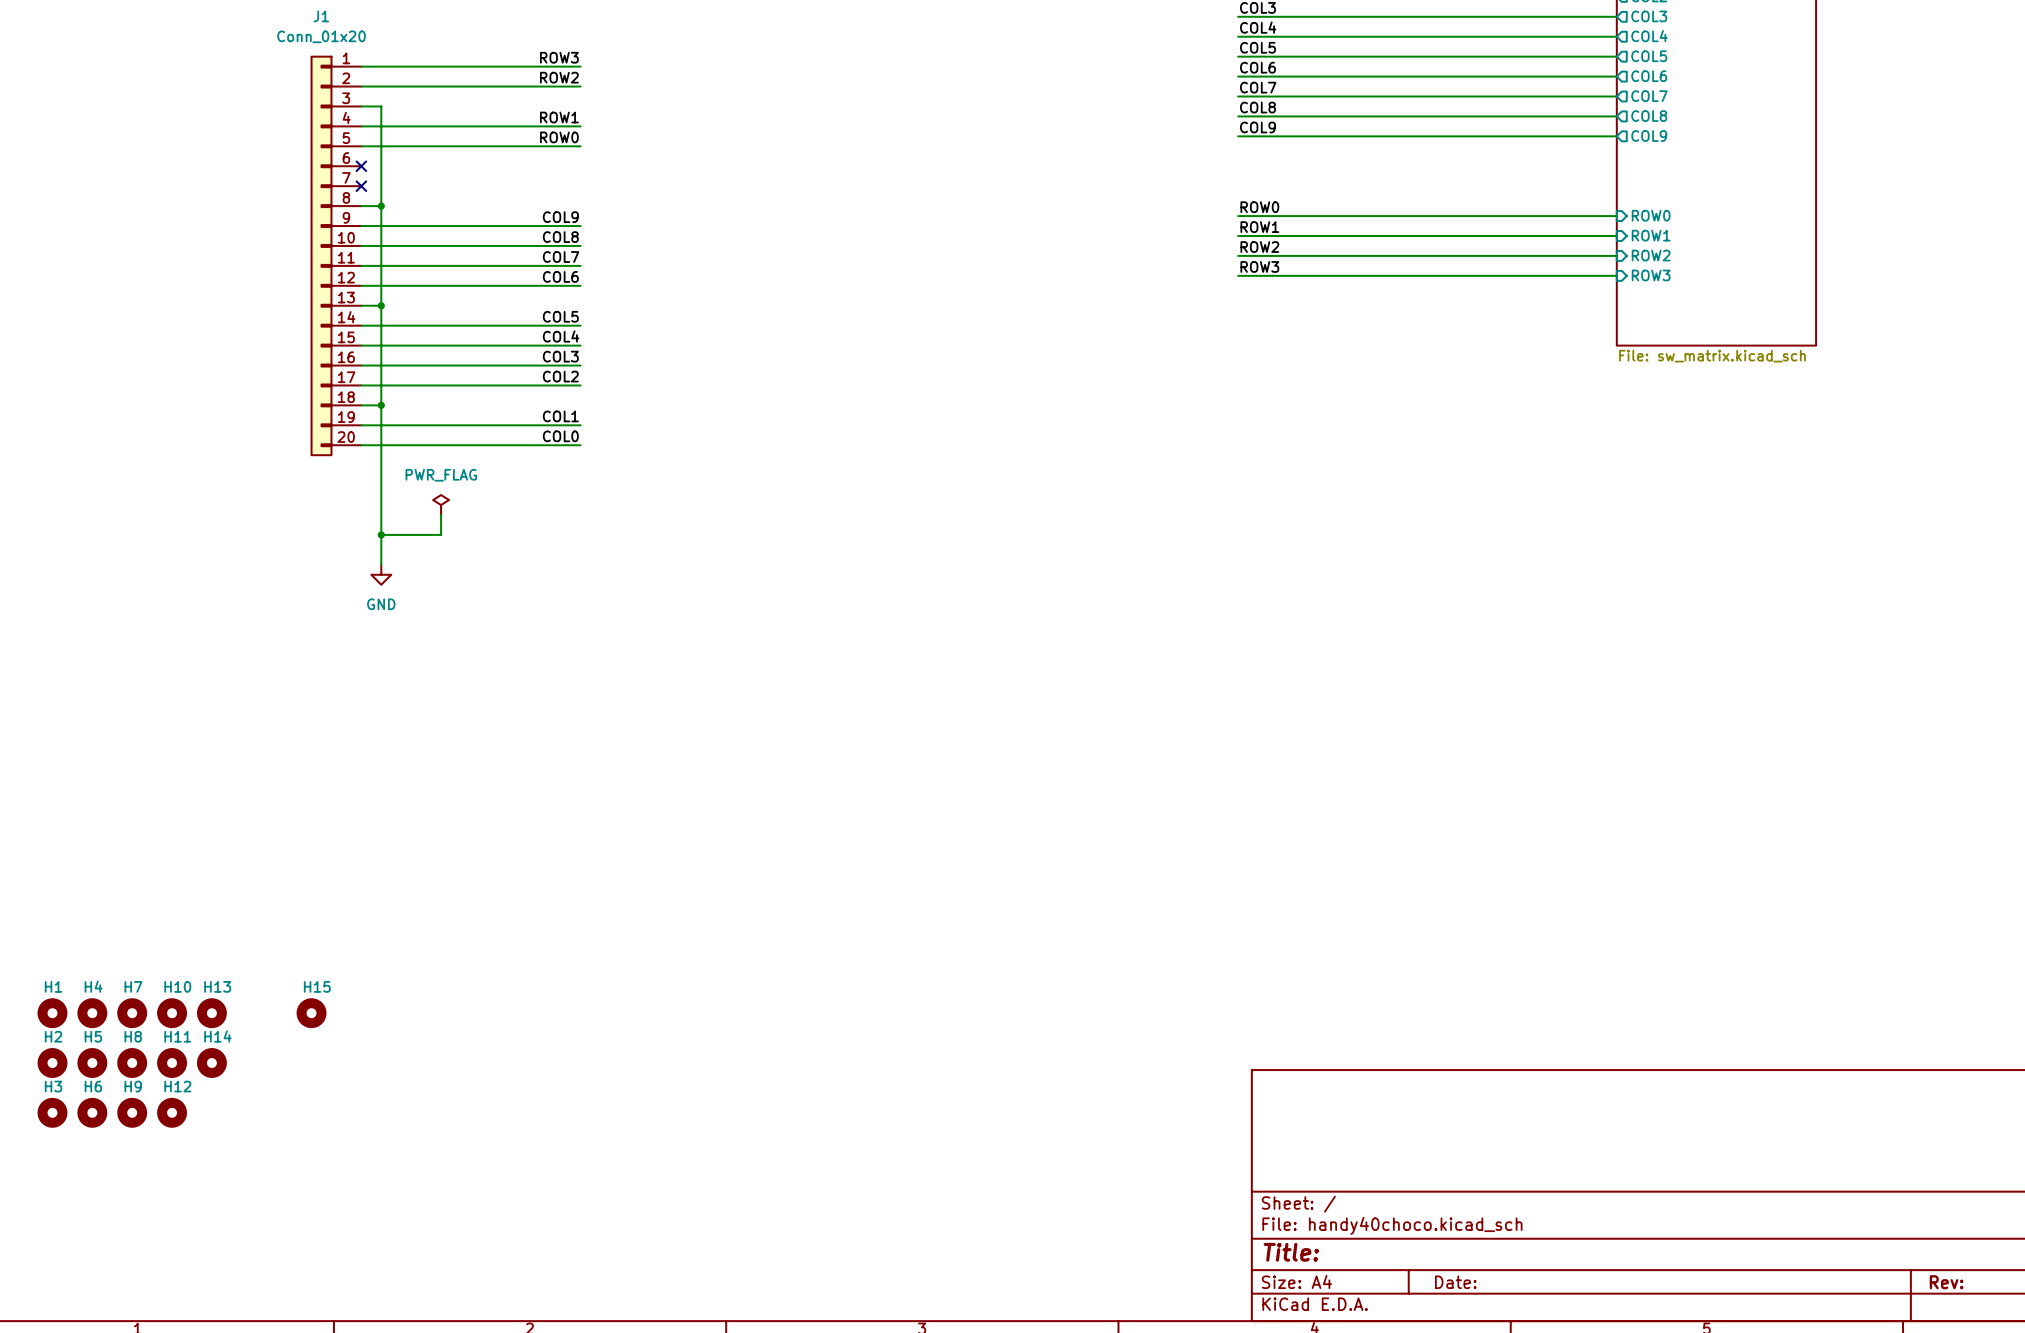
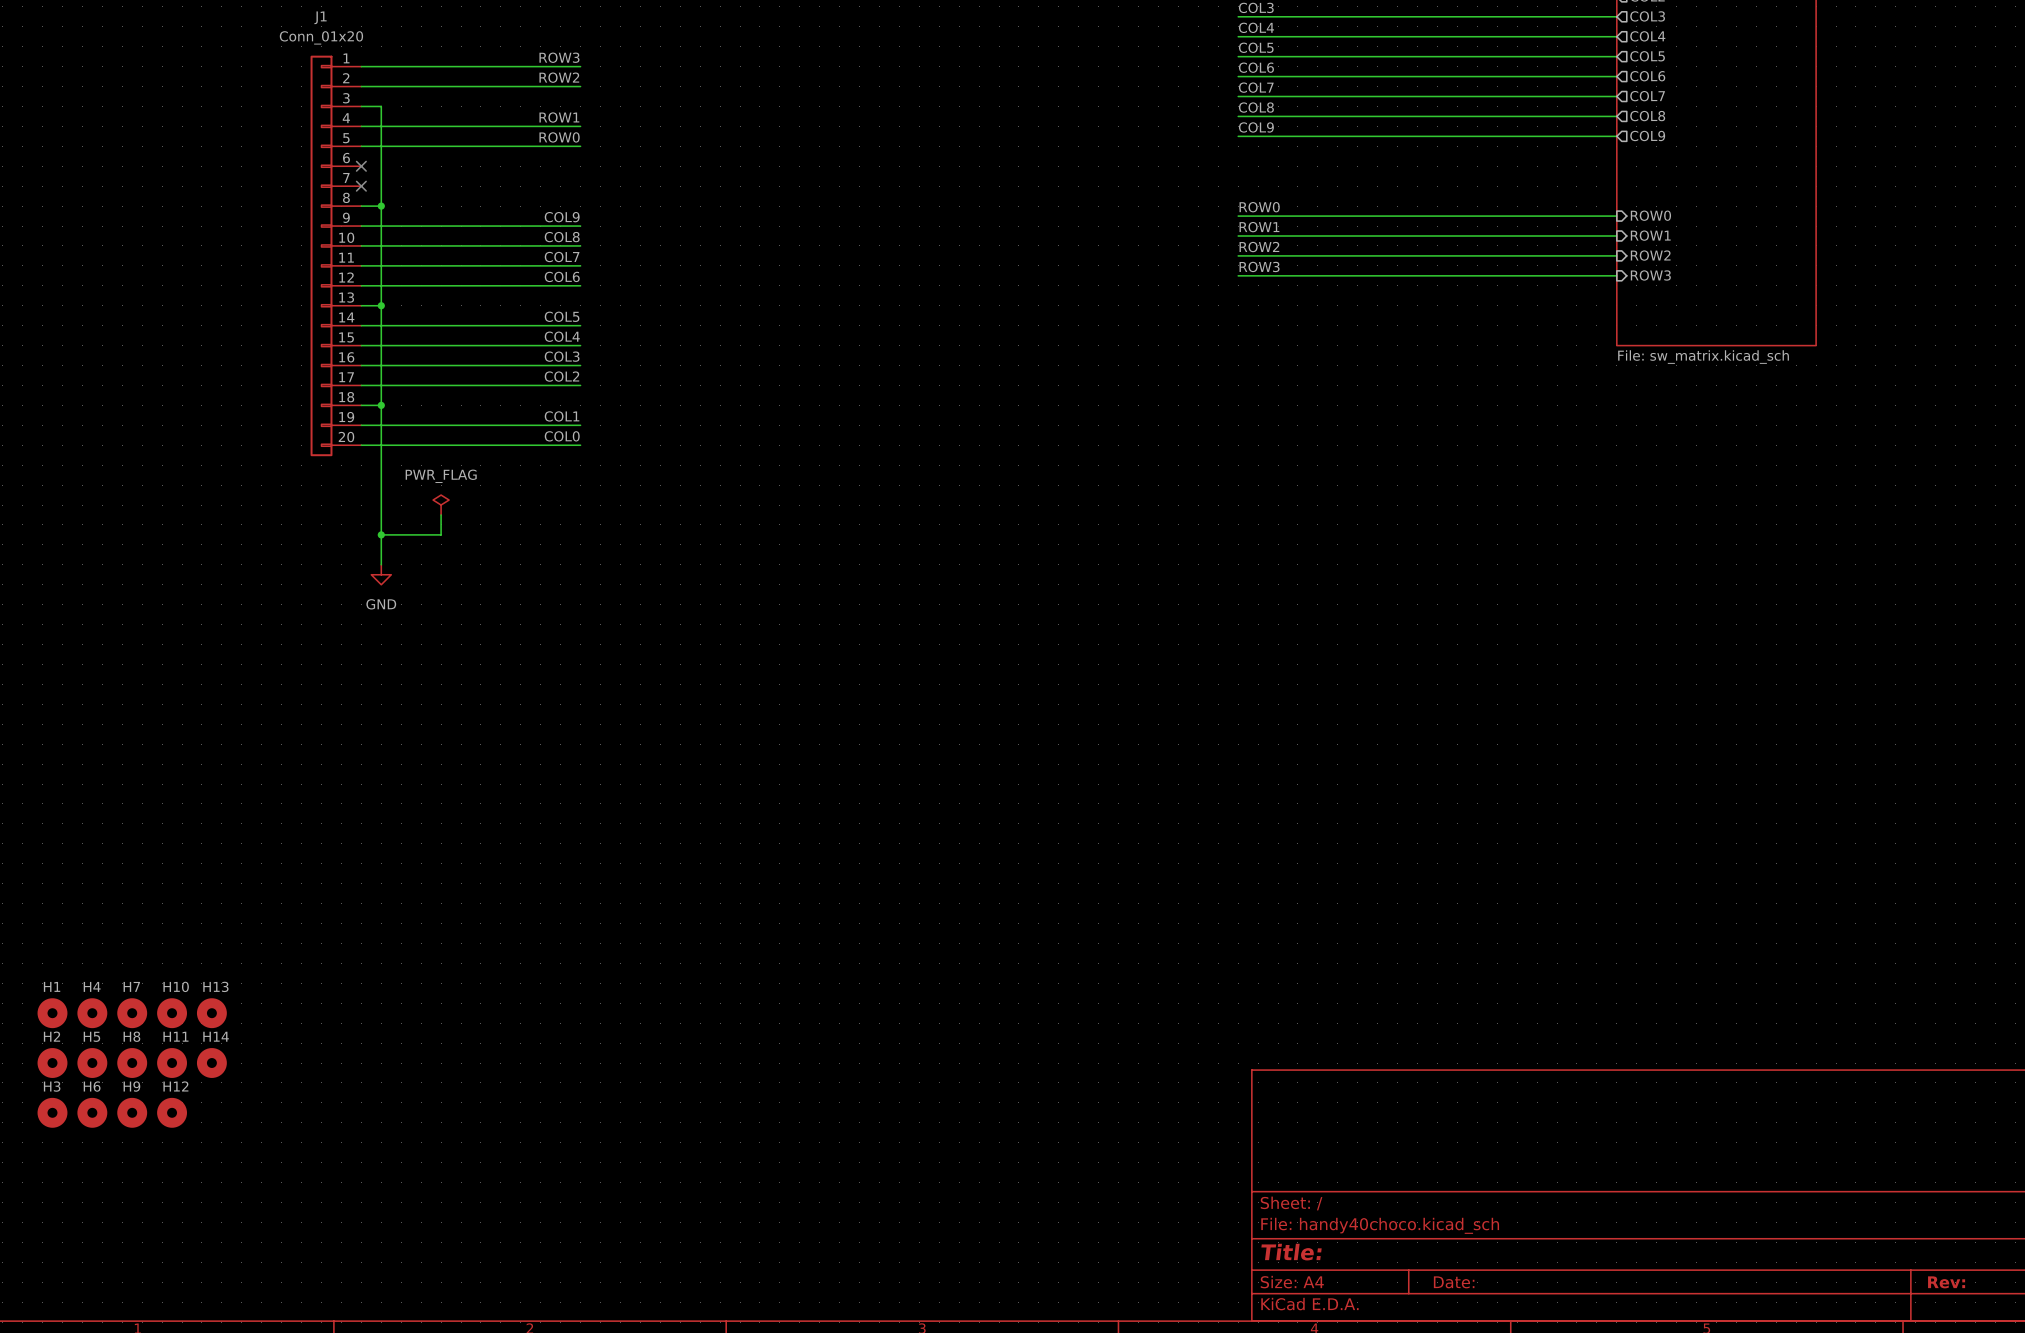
H15: (311, 1013) -> none

